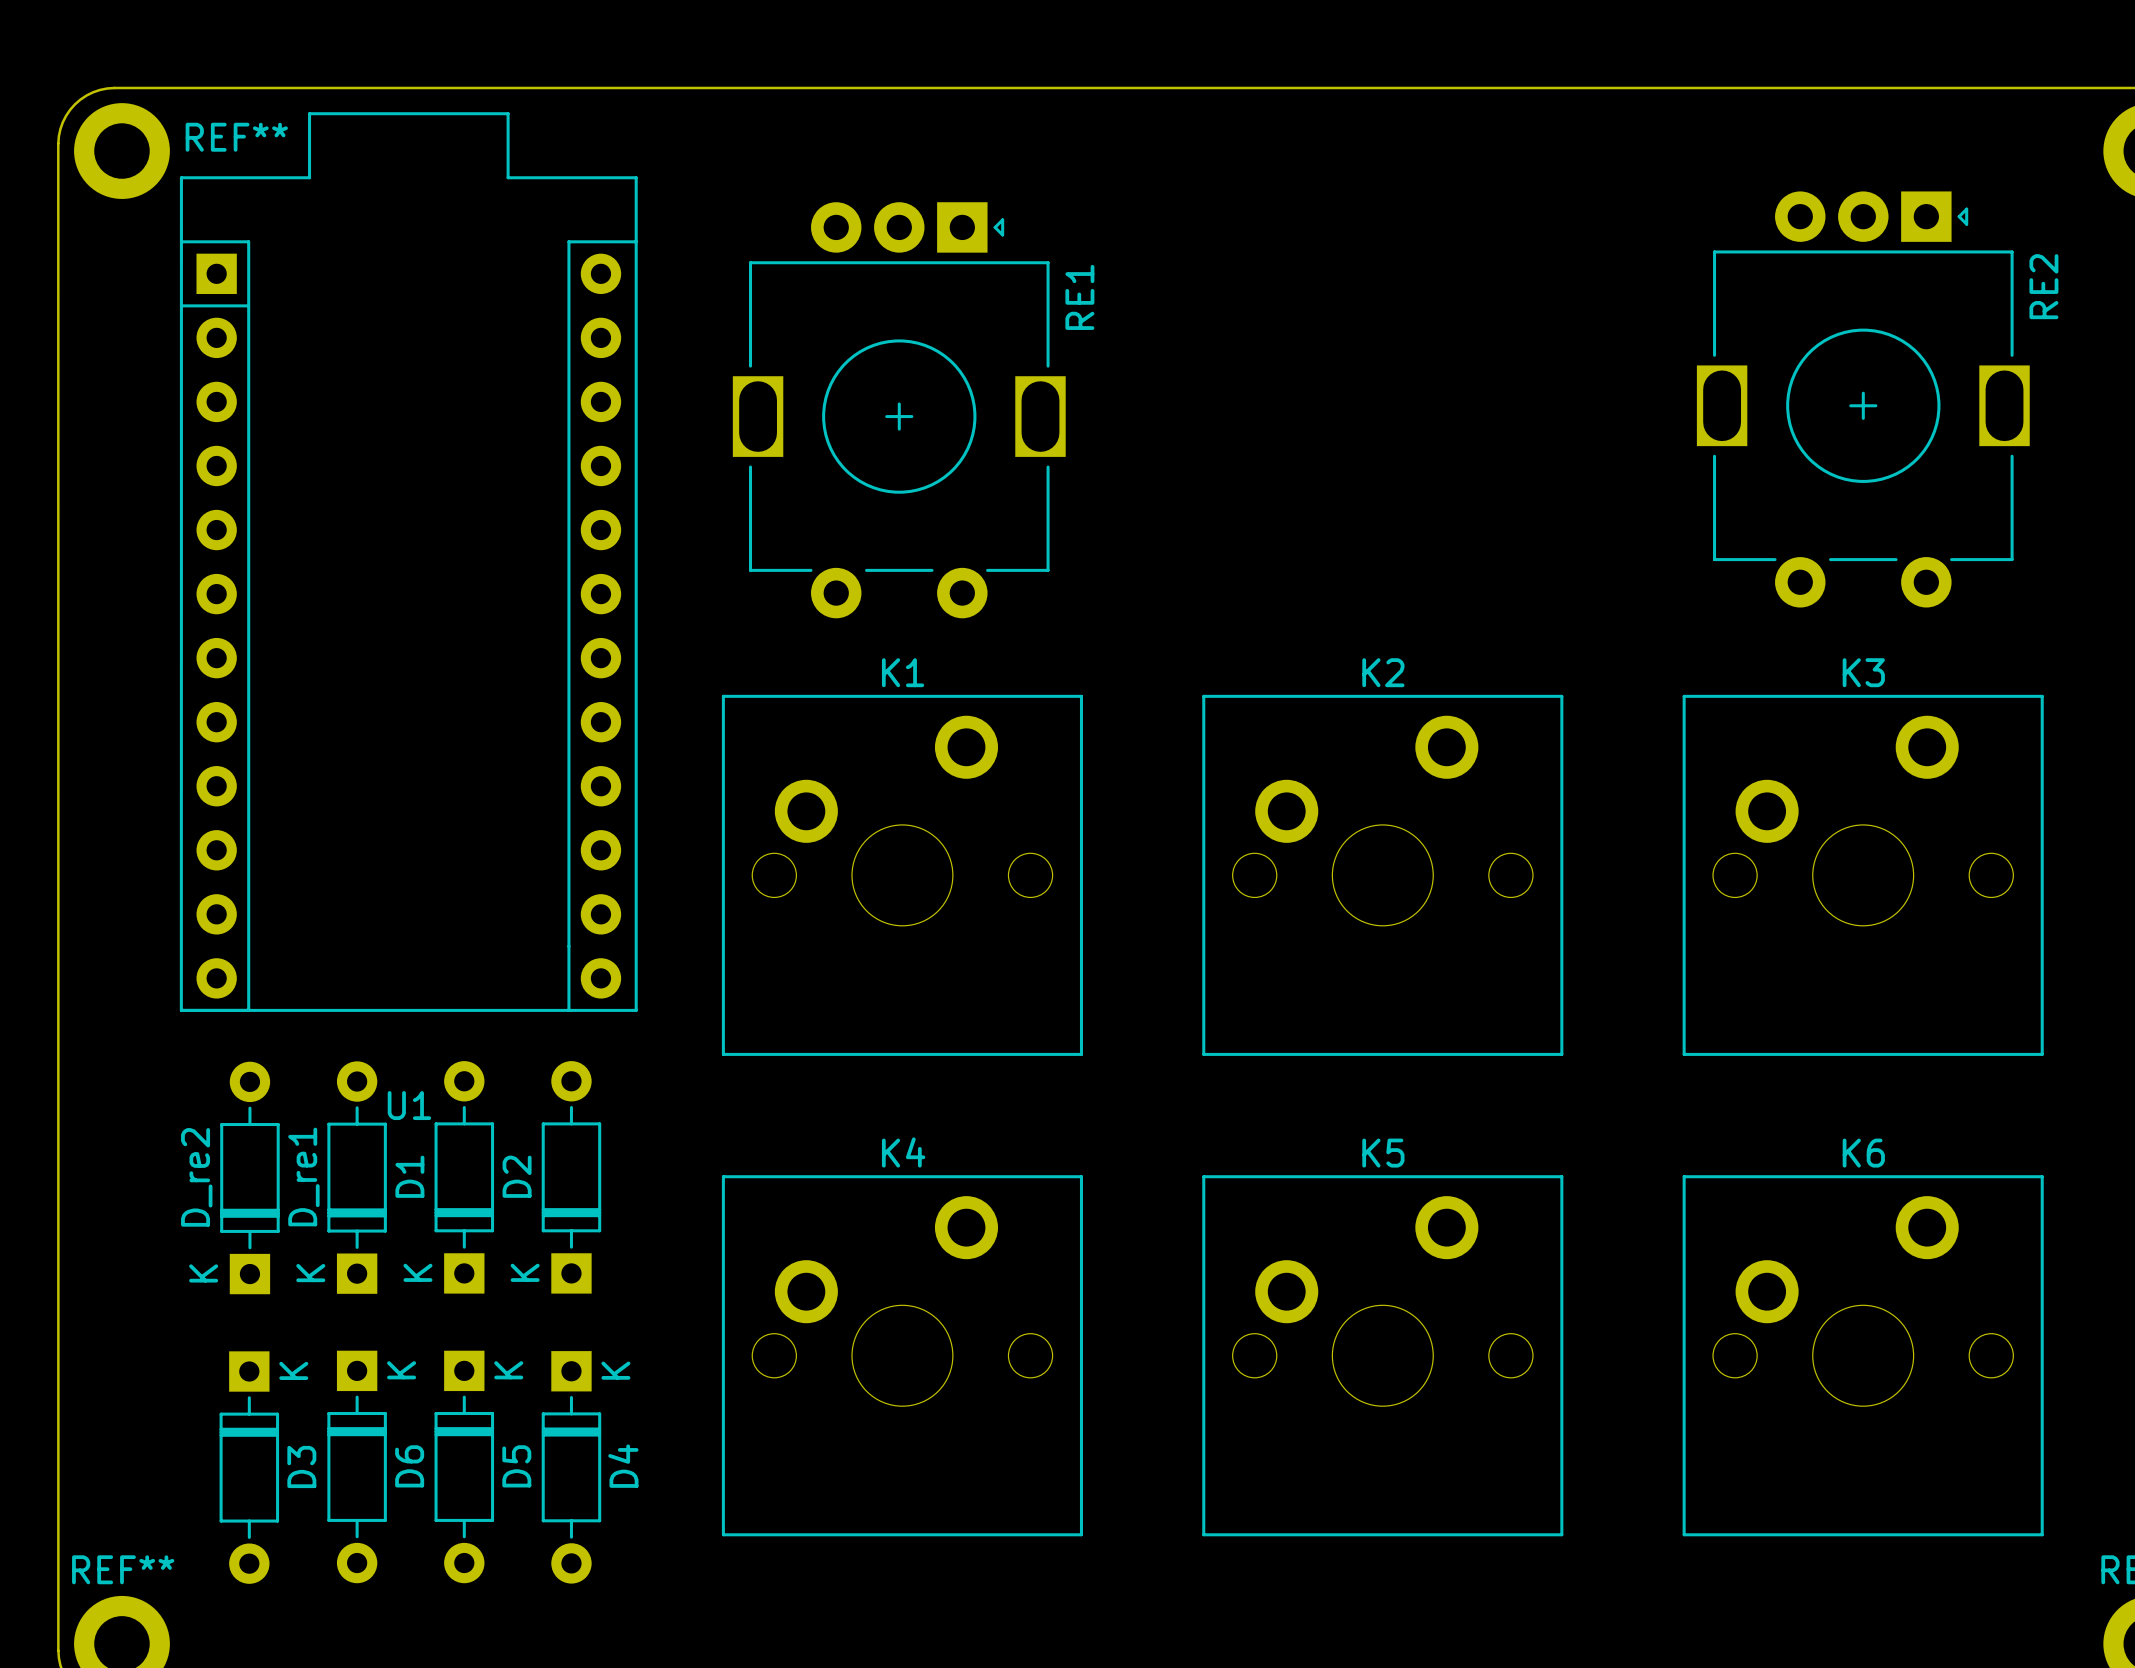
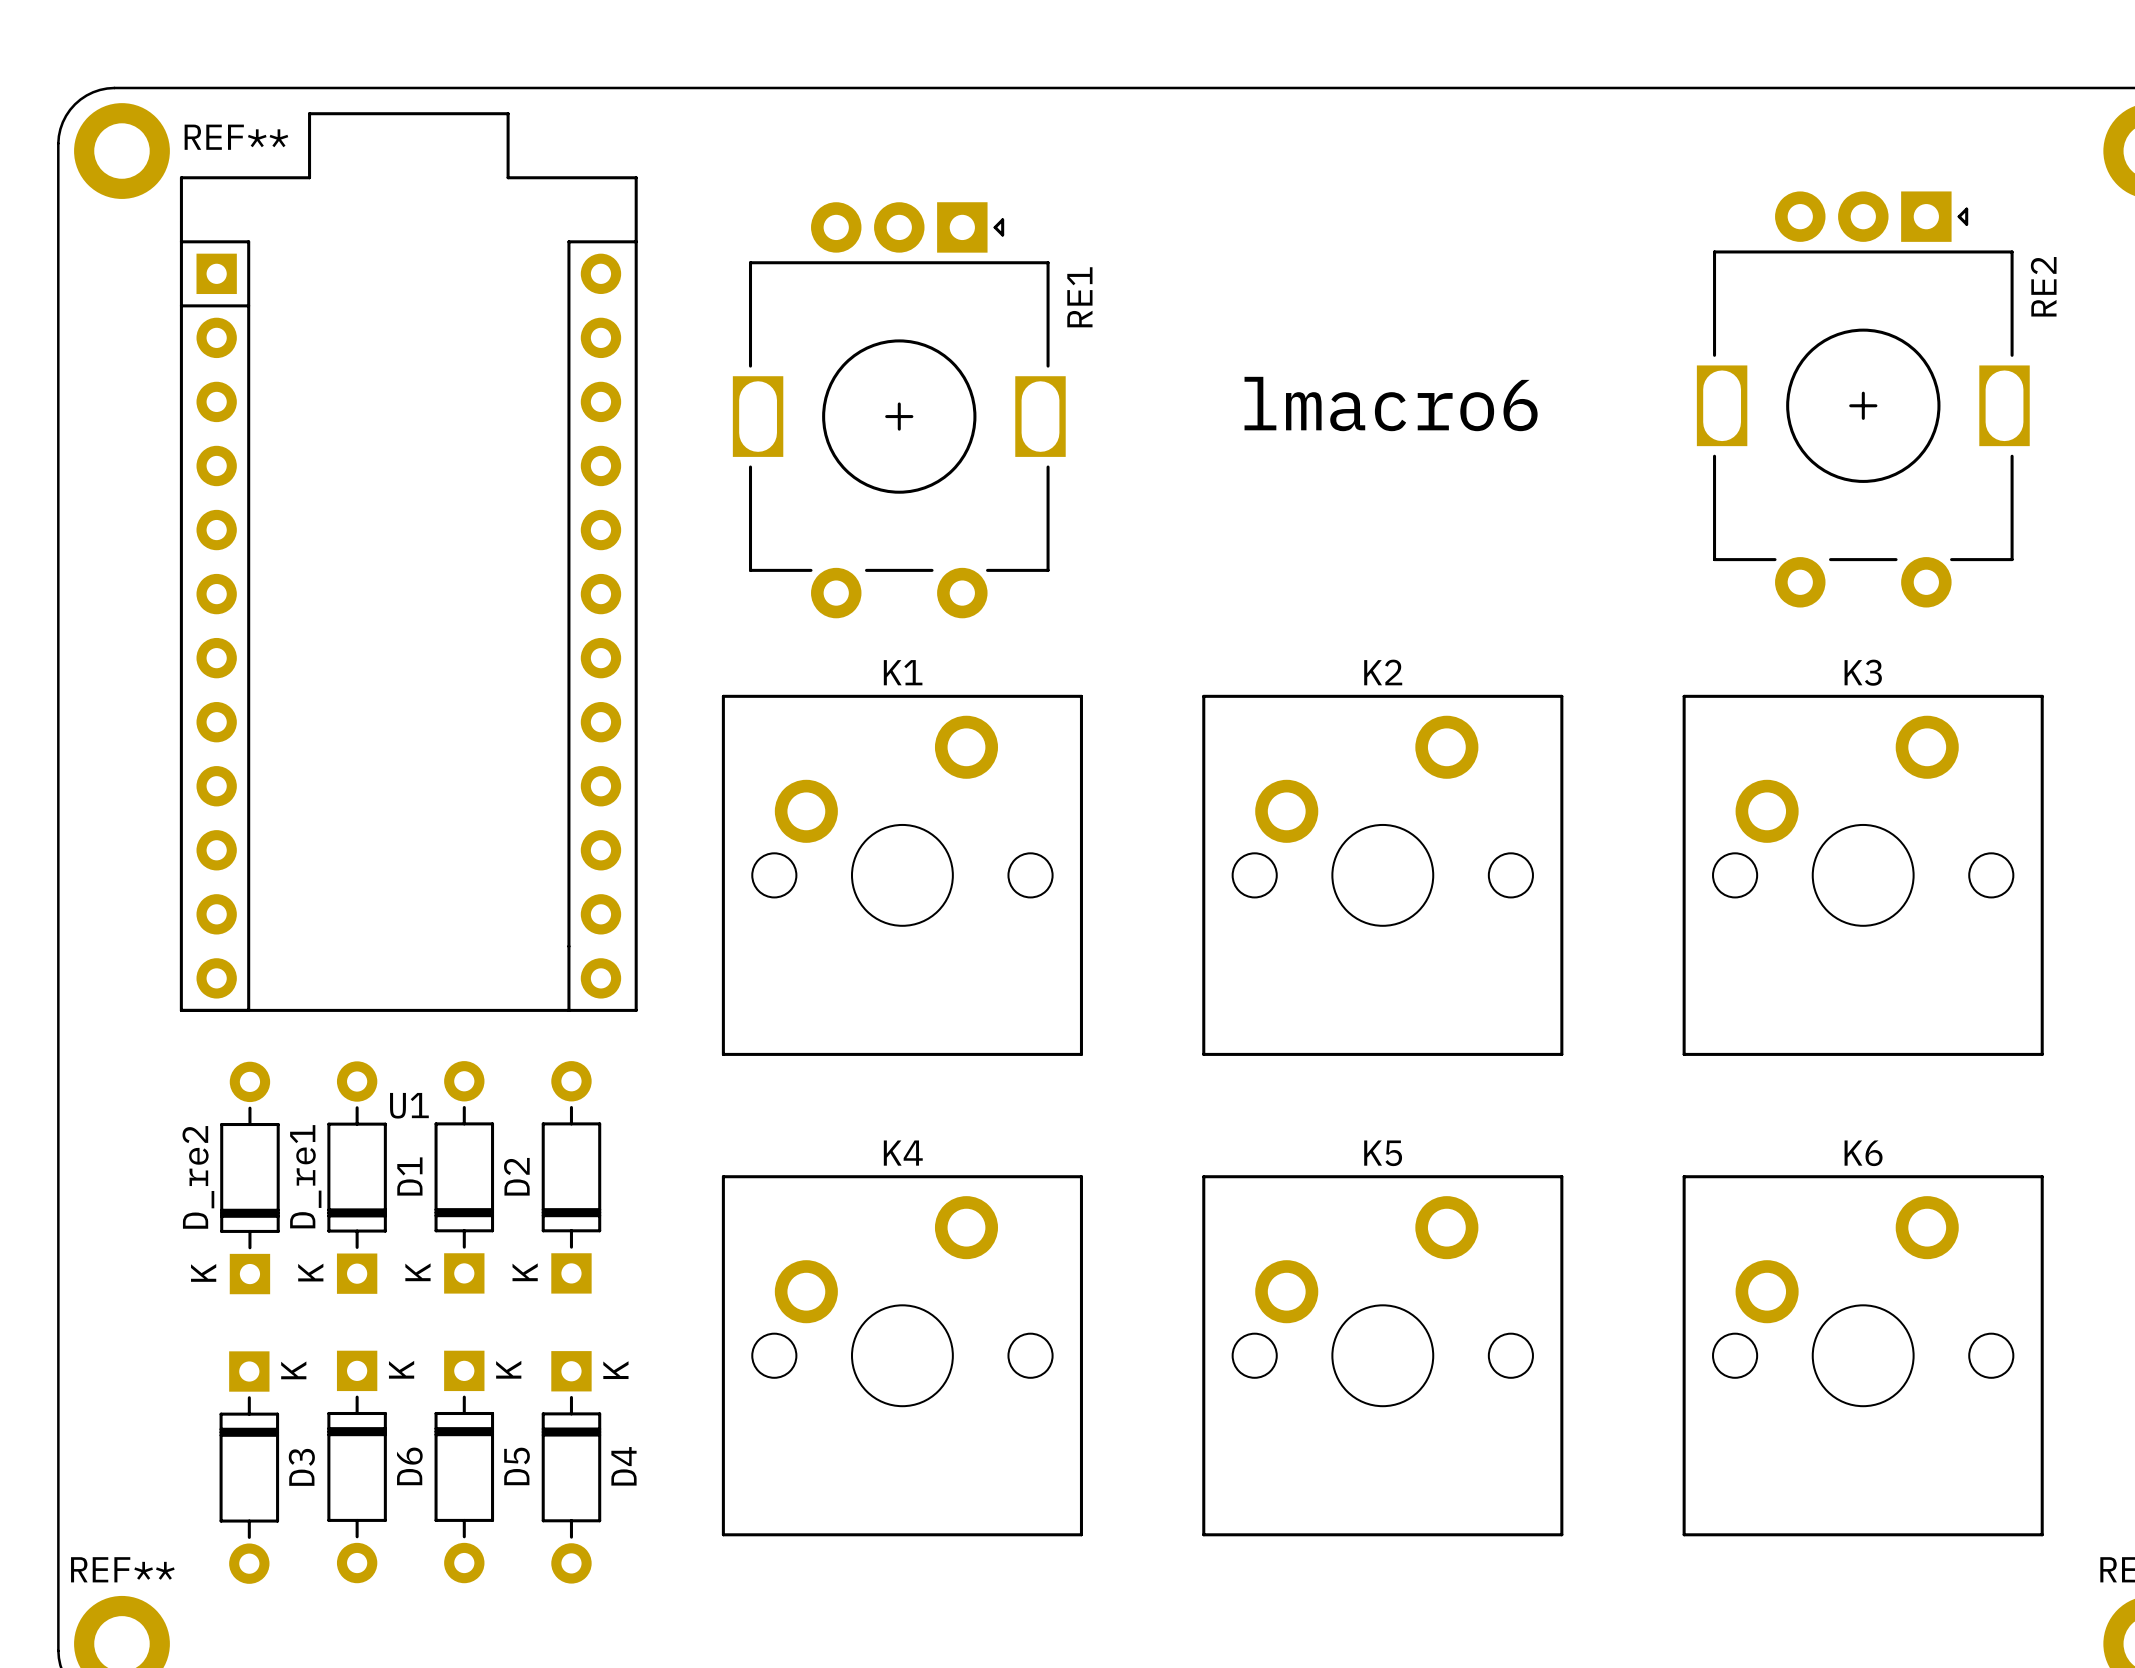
text: none -> lmacro6 (1391, 404)

